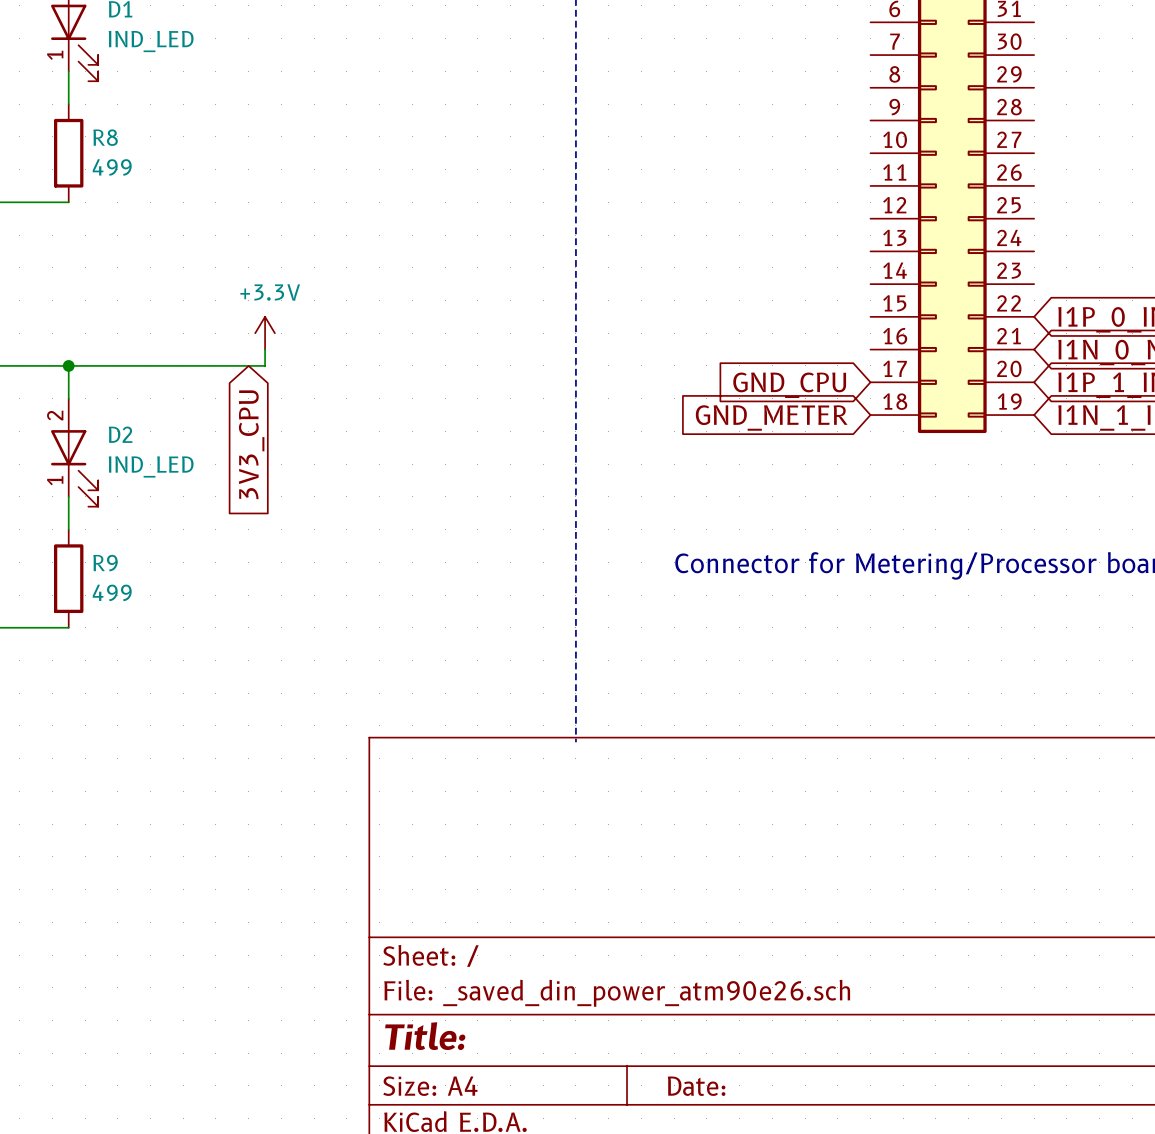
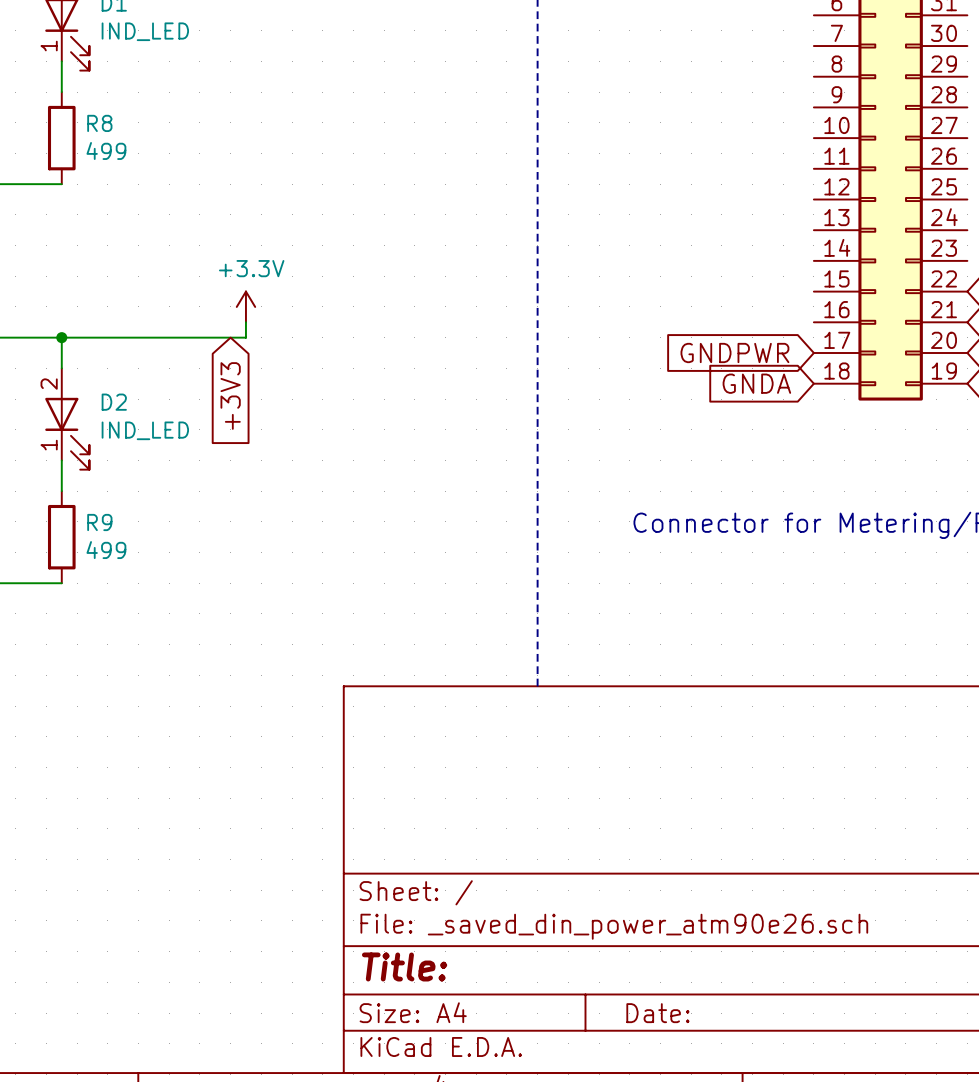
global label: GND_CPU (789, 385) -> GNDPWR (734, 353)
global label: GND_METER (771, 417) -> GNDA (756, 383)
global label: 3V3_CPU (251, 444) -> +3V3 (230, 395)

